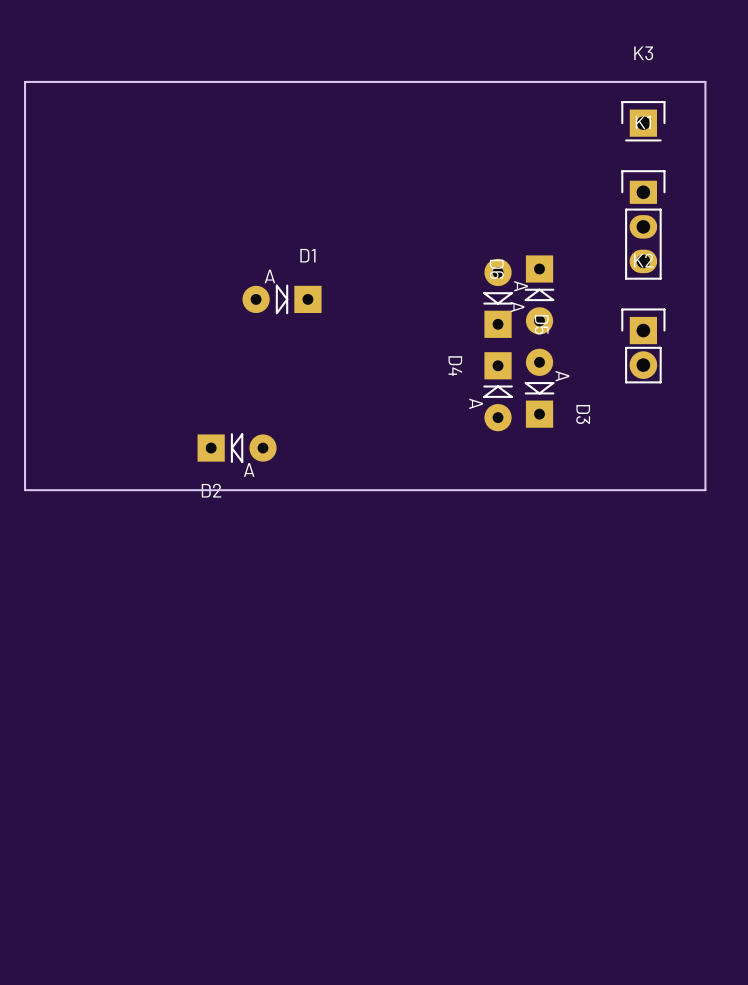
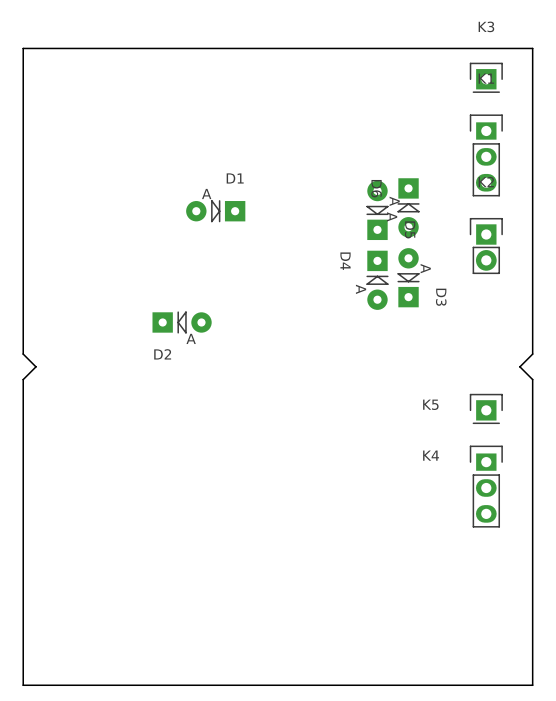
board edge: (705, 81) (705, 490) (25, 490) (25, 81) (705, 81) -> (532, 48) (532, 354) (519, 366) (532, 379) (532, 685) (23, 685) (23, 379) (35, 366) (23, 354) (23, 48) (532, 48)
K5: none -> (486, 408)
K4: none -> (486, 486)

